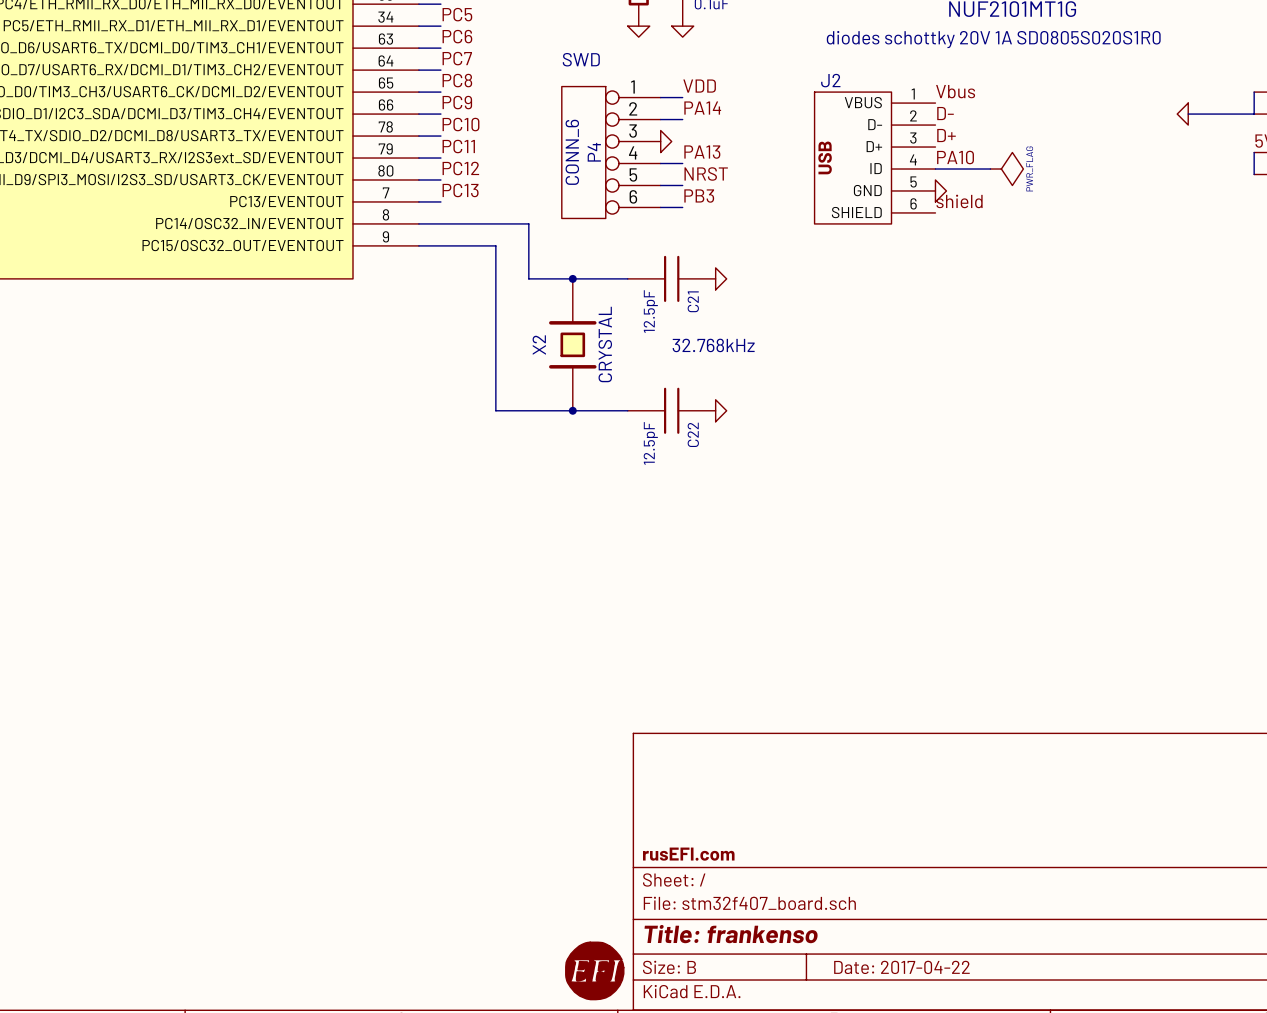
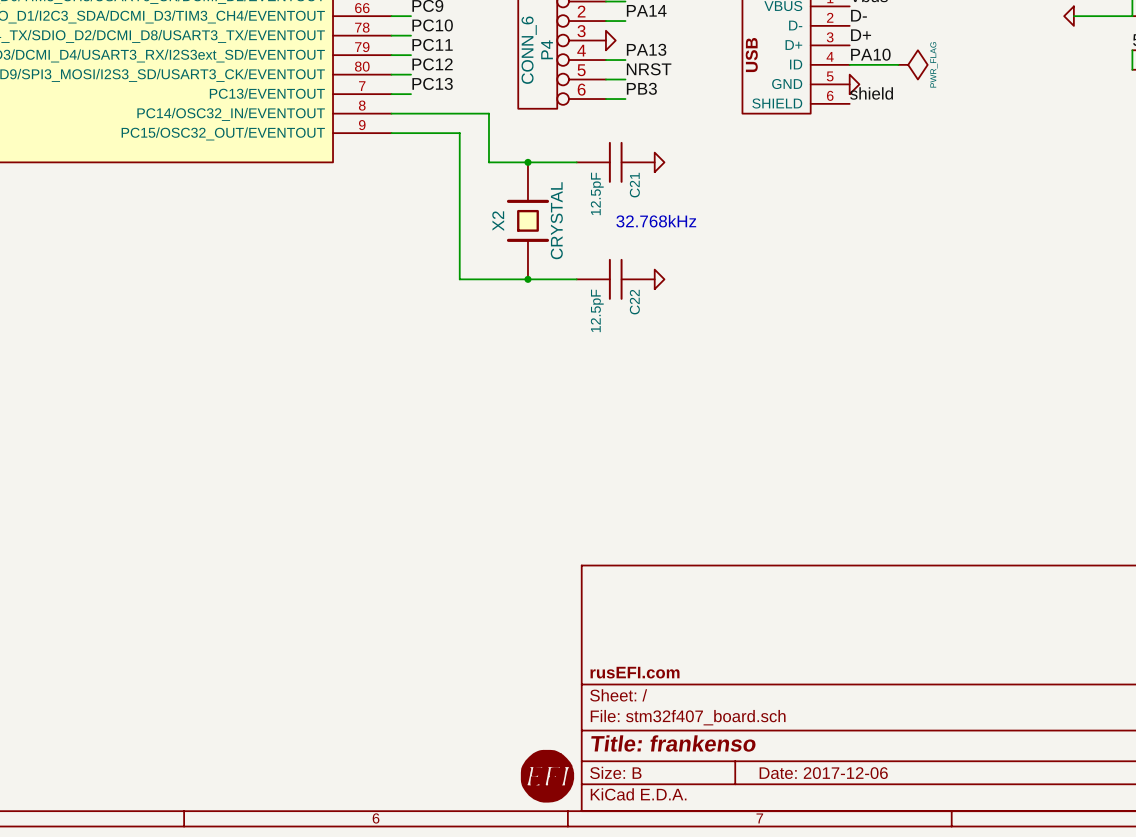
title block: Date: 2017-04-22 (901, 967) -> Date: 2017-12-06 (823, 773)

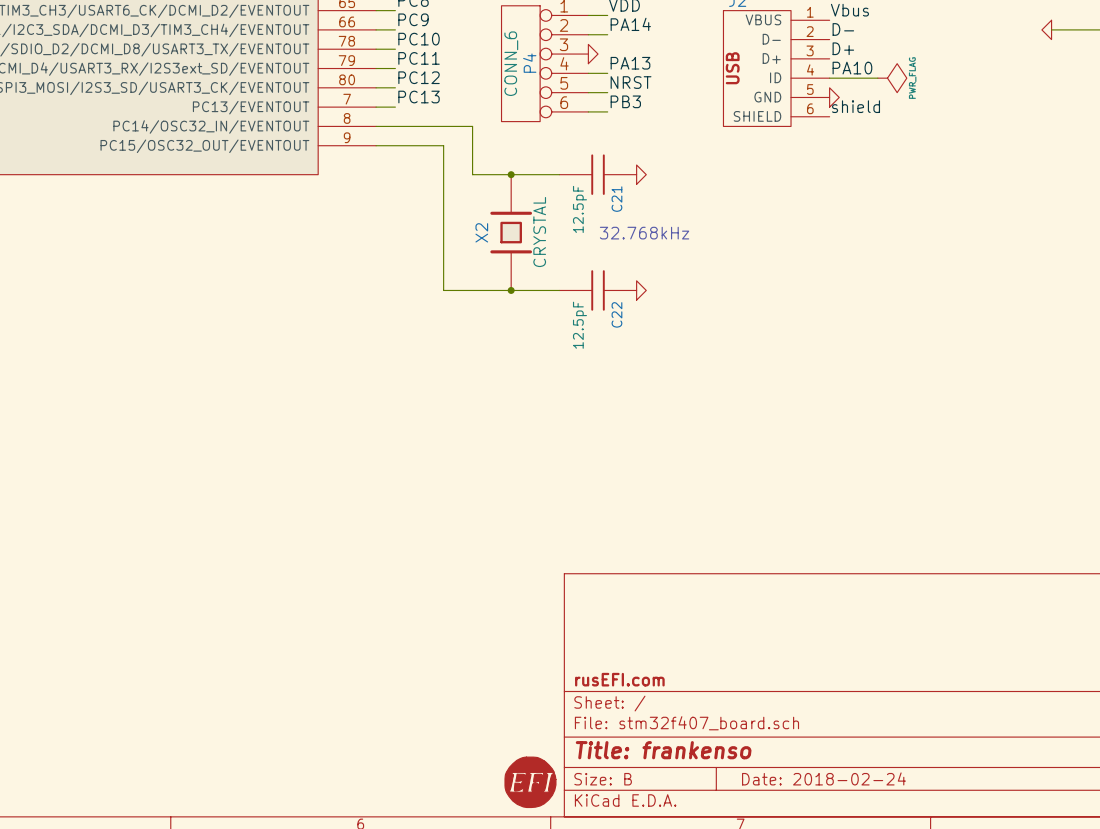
title block: Date: 2017-12-06 (823, 773) -> Date: 2018-02-24 (824, 778)

